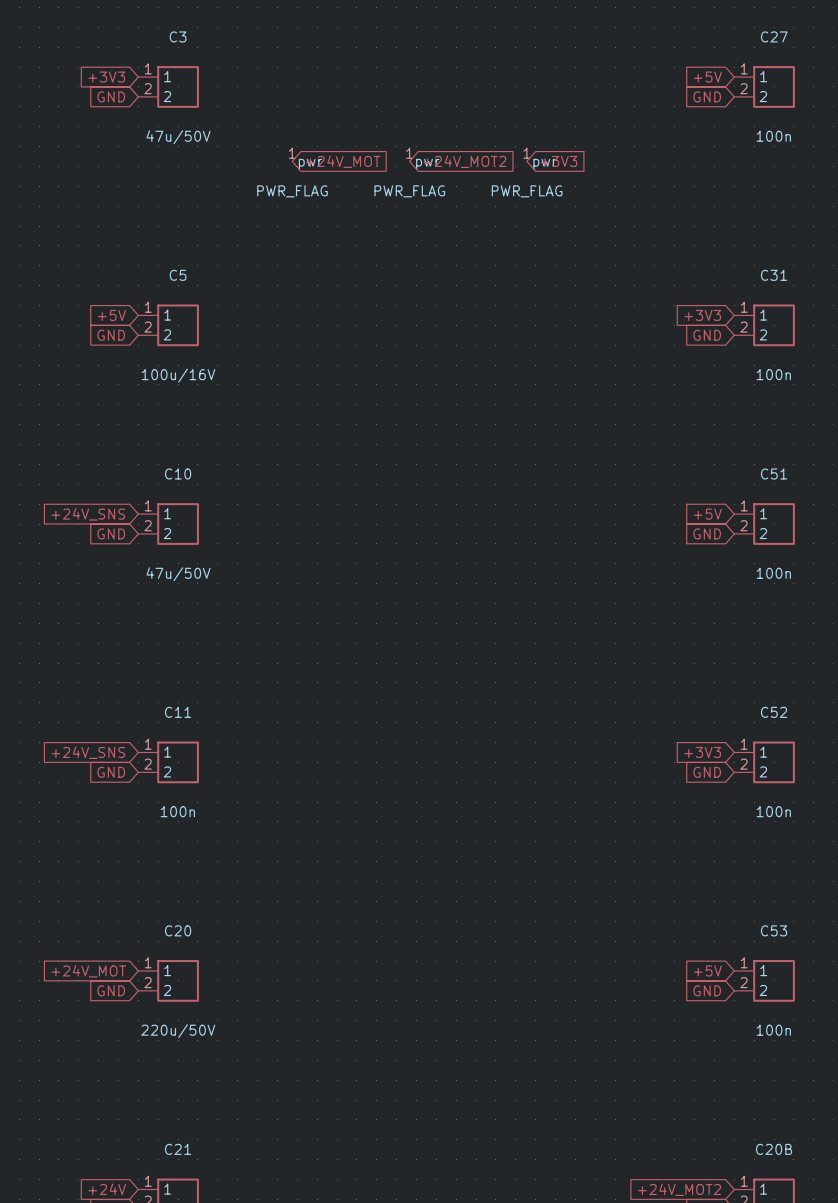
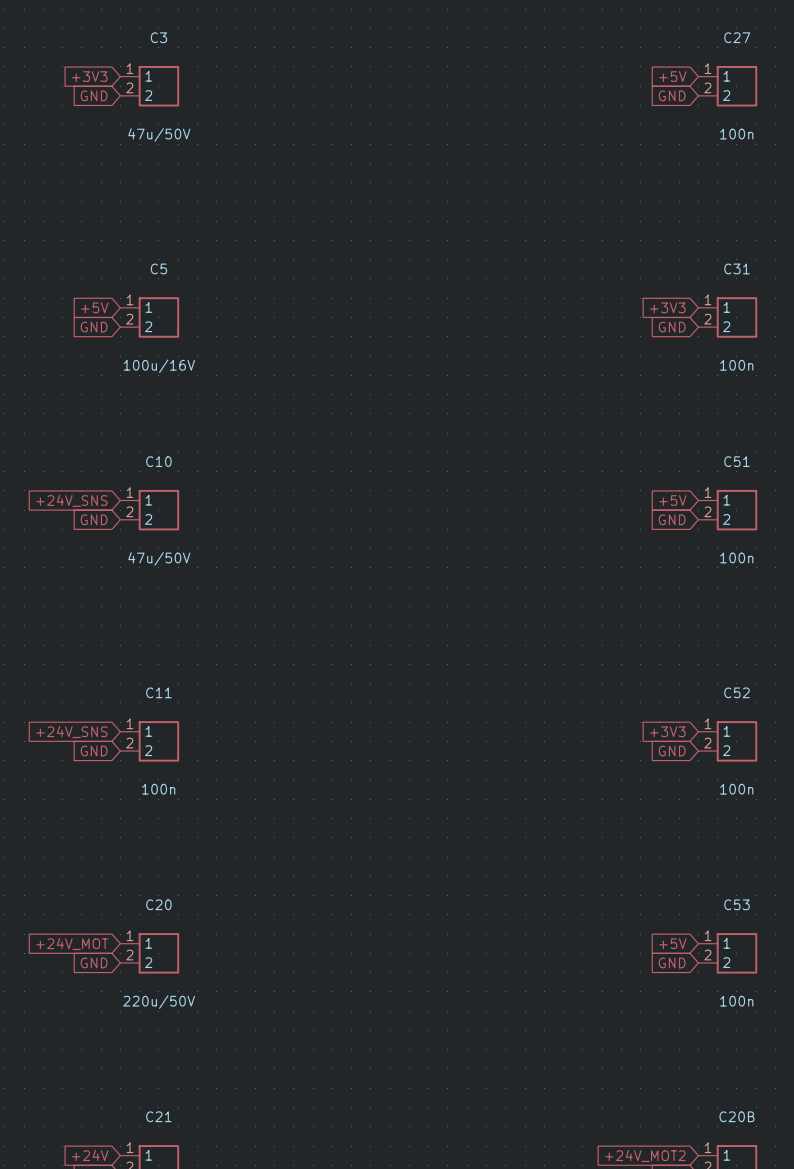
global label: +24V_MOT (343, 161) -> none
global label: +24V_MOT2 (464, 161) -> none
global label: +3V3 (558, 161) -> none
power symbol: PWR_FLAG (292, 172) -> none
power symbol: PWR_FLAG (409, 172) -> none
power symbol: PWR_FLAG (527, 172) -> none

